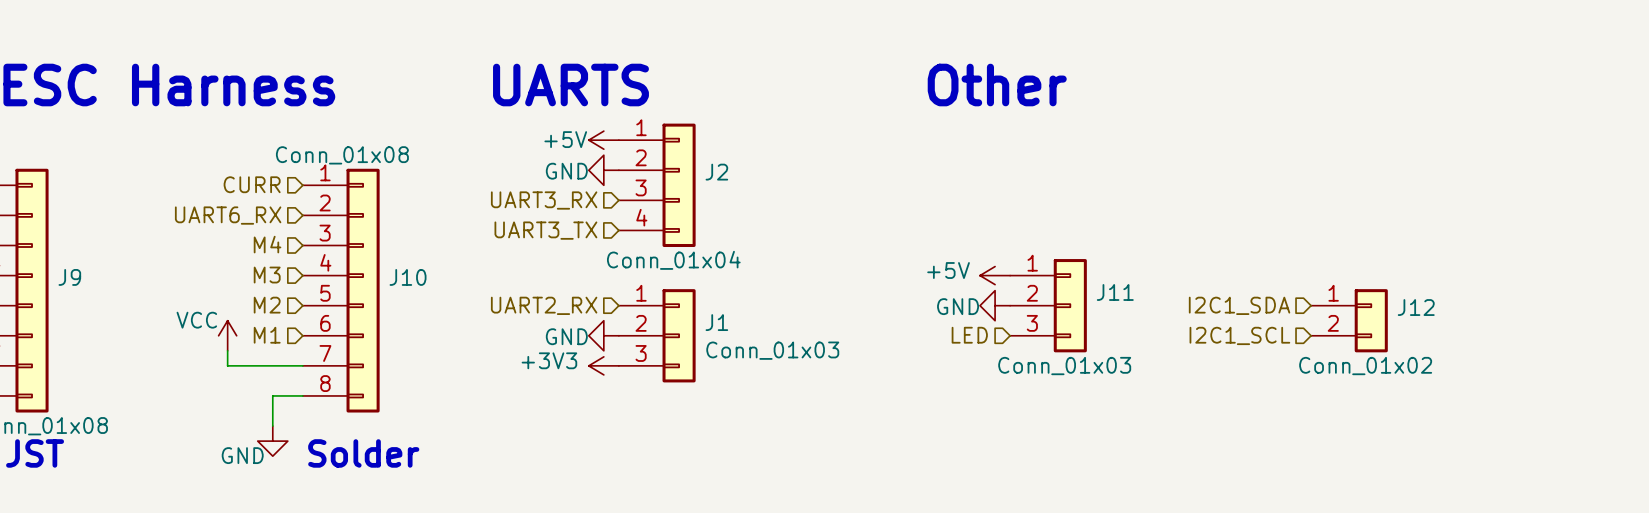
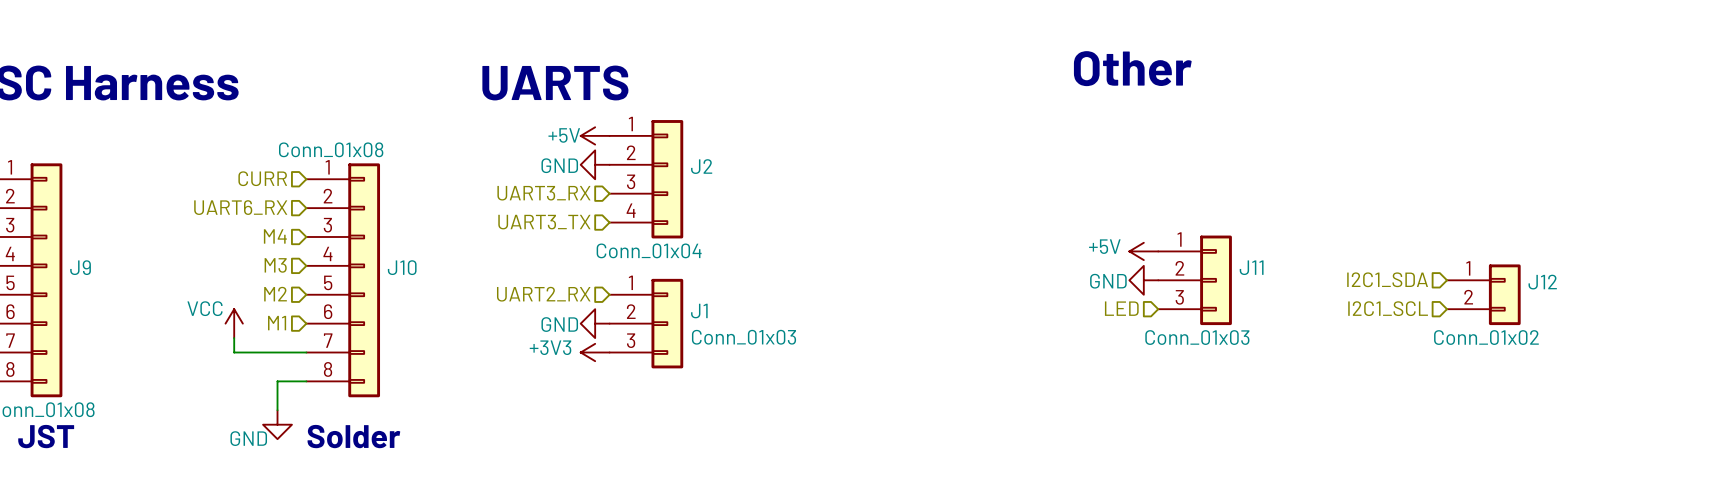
text position: Other (997, 85) -> Other (1132, 68)
power symbol position: +5V (995, 275) -> +5V (1143, 251)
power symbol position: GND (995, 305) -> GND (1143, 280)
J11 position: (1048, 305) -> (1195, 280)
hierarchical label position: I2C1_SDA (1239, 305) -> I2C1_SDA (1387, 279)
J12 position: (1349, 320) -> (1483, 294)
hierarchical label position: LED (969, 335) -> LED (1121, 308)
hierarchical label position: I2C1_SCL (1239, 335) -> I2C1_SCL (1388, 308)

